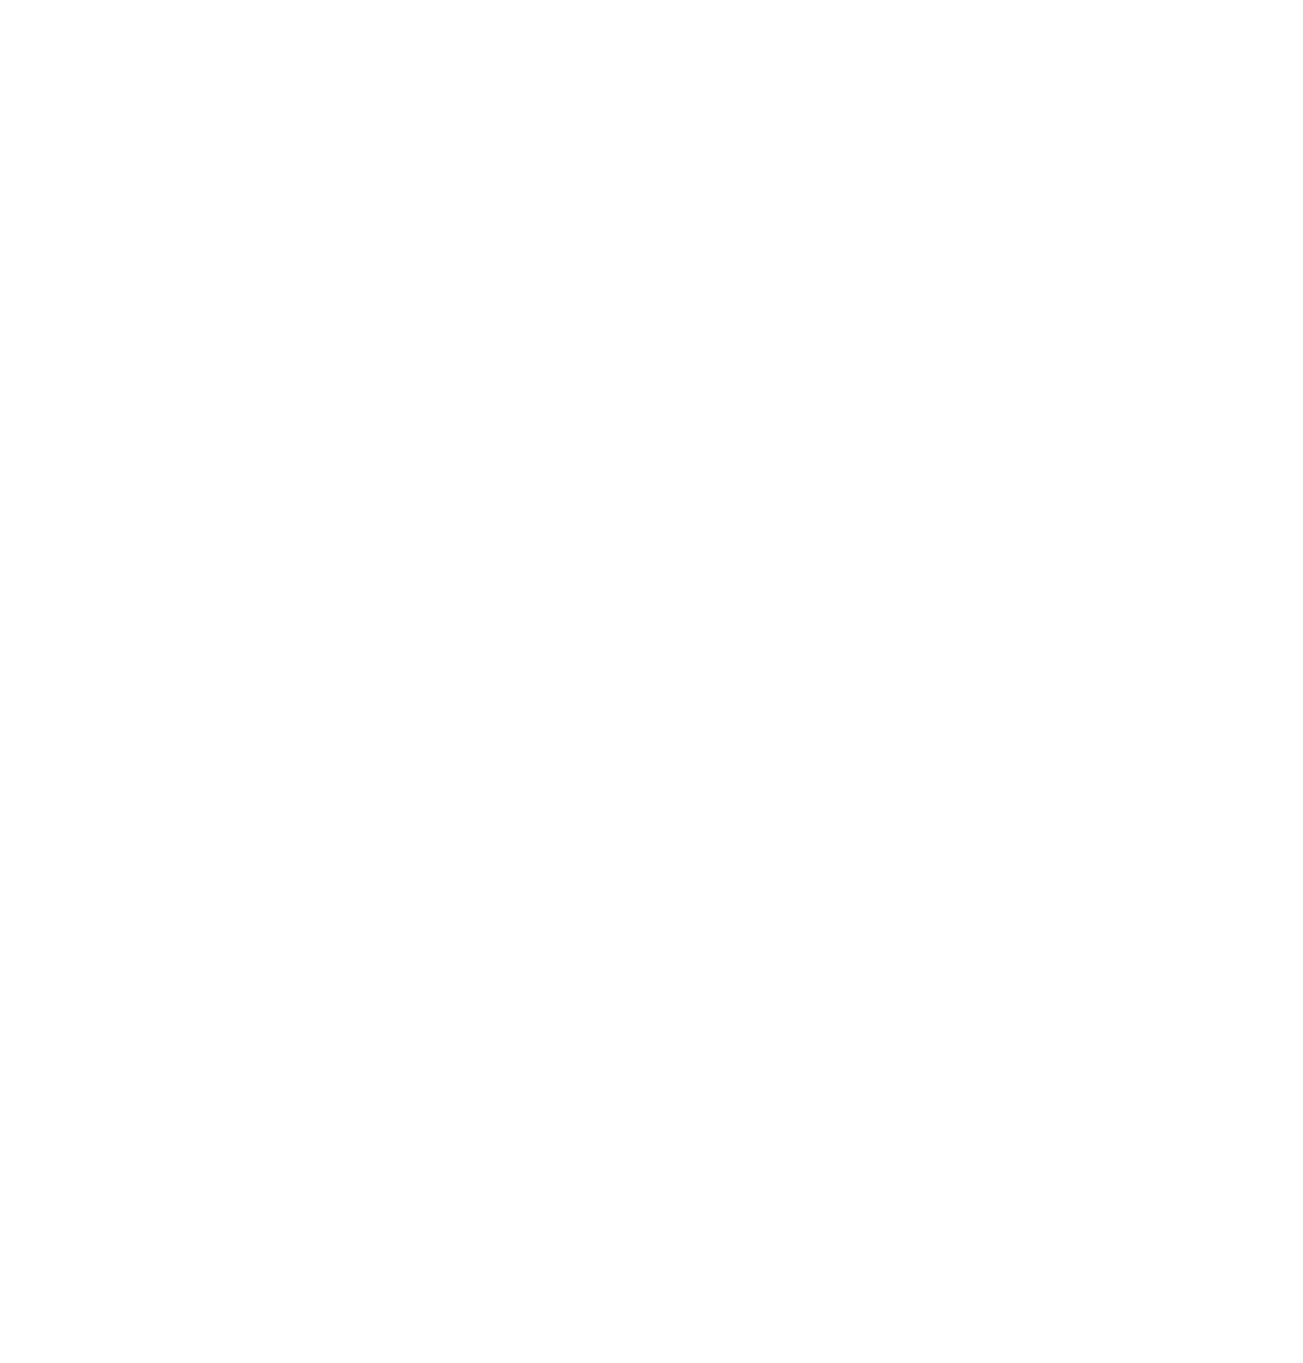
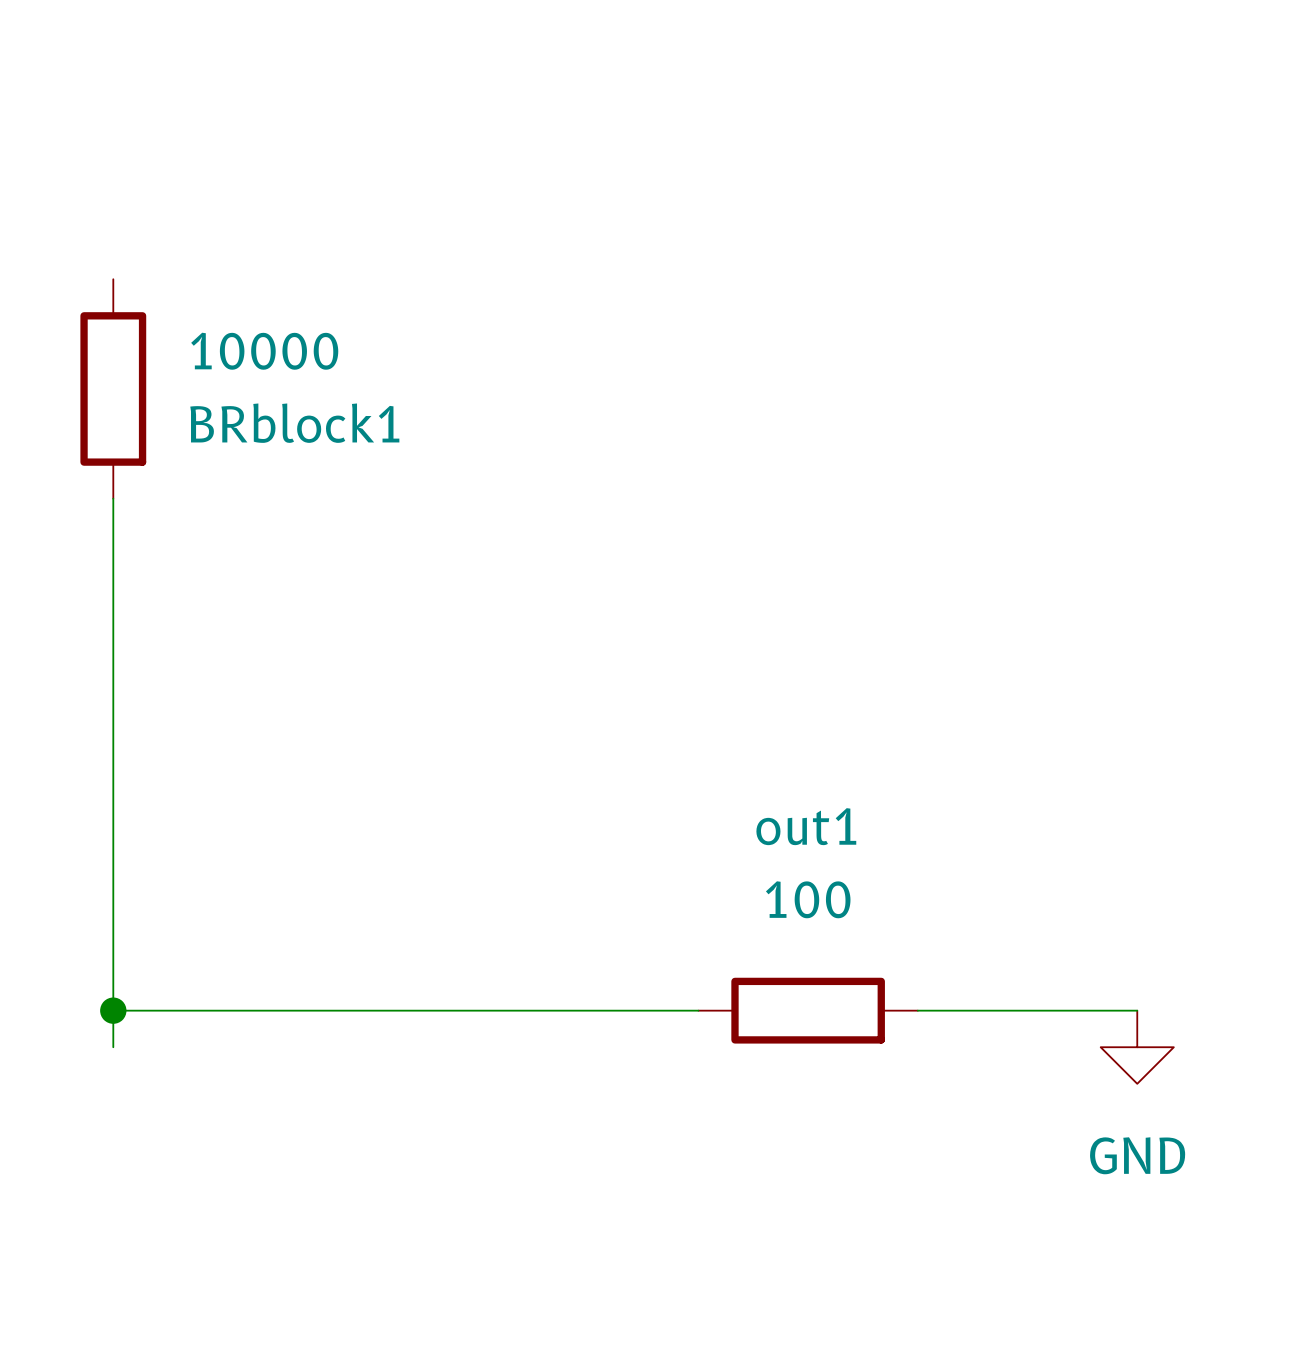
BRblock1: none -> 10000 (113, 388)
wire: none -> (113, 498) (113, 1047)
wire: none -> (113, 1010) (698, 1010)
junction: none -> (113, 1010)
out1: none -> 100 (808, 1010)
wire: none -> (917, 1010) (1137, 1010)
power symbol: none -> GND (1137, 1047)

